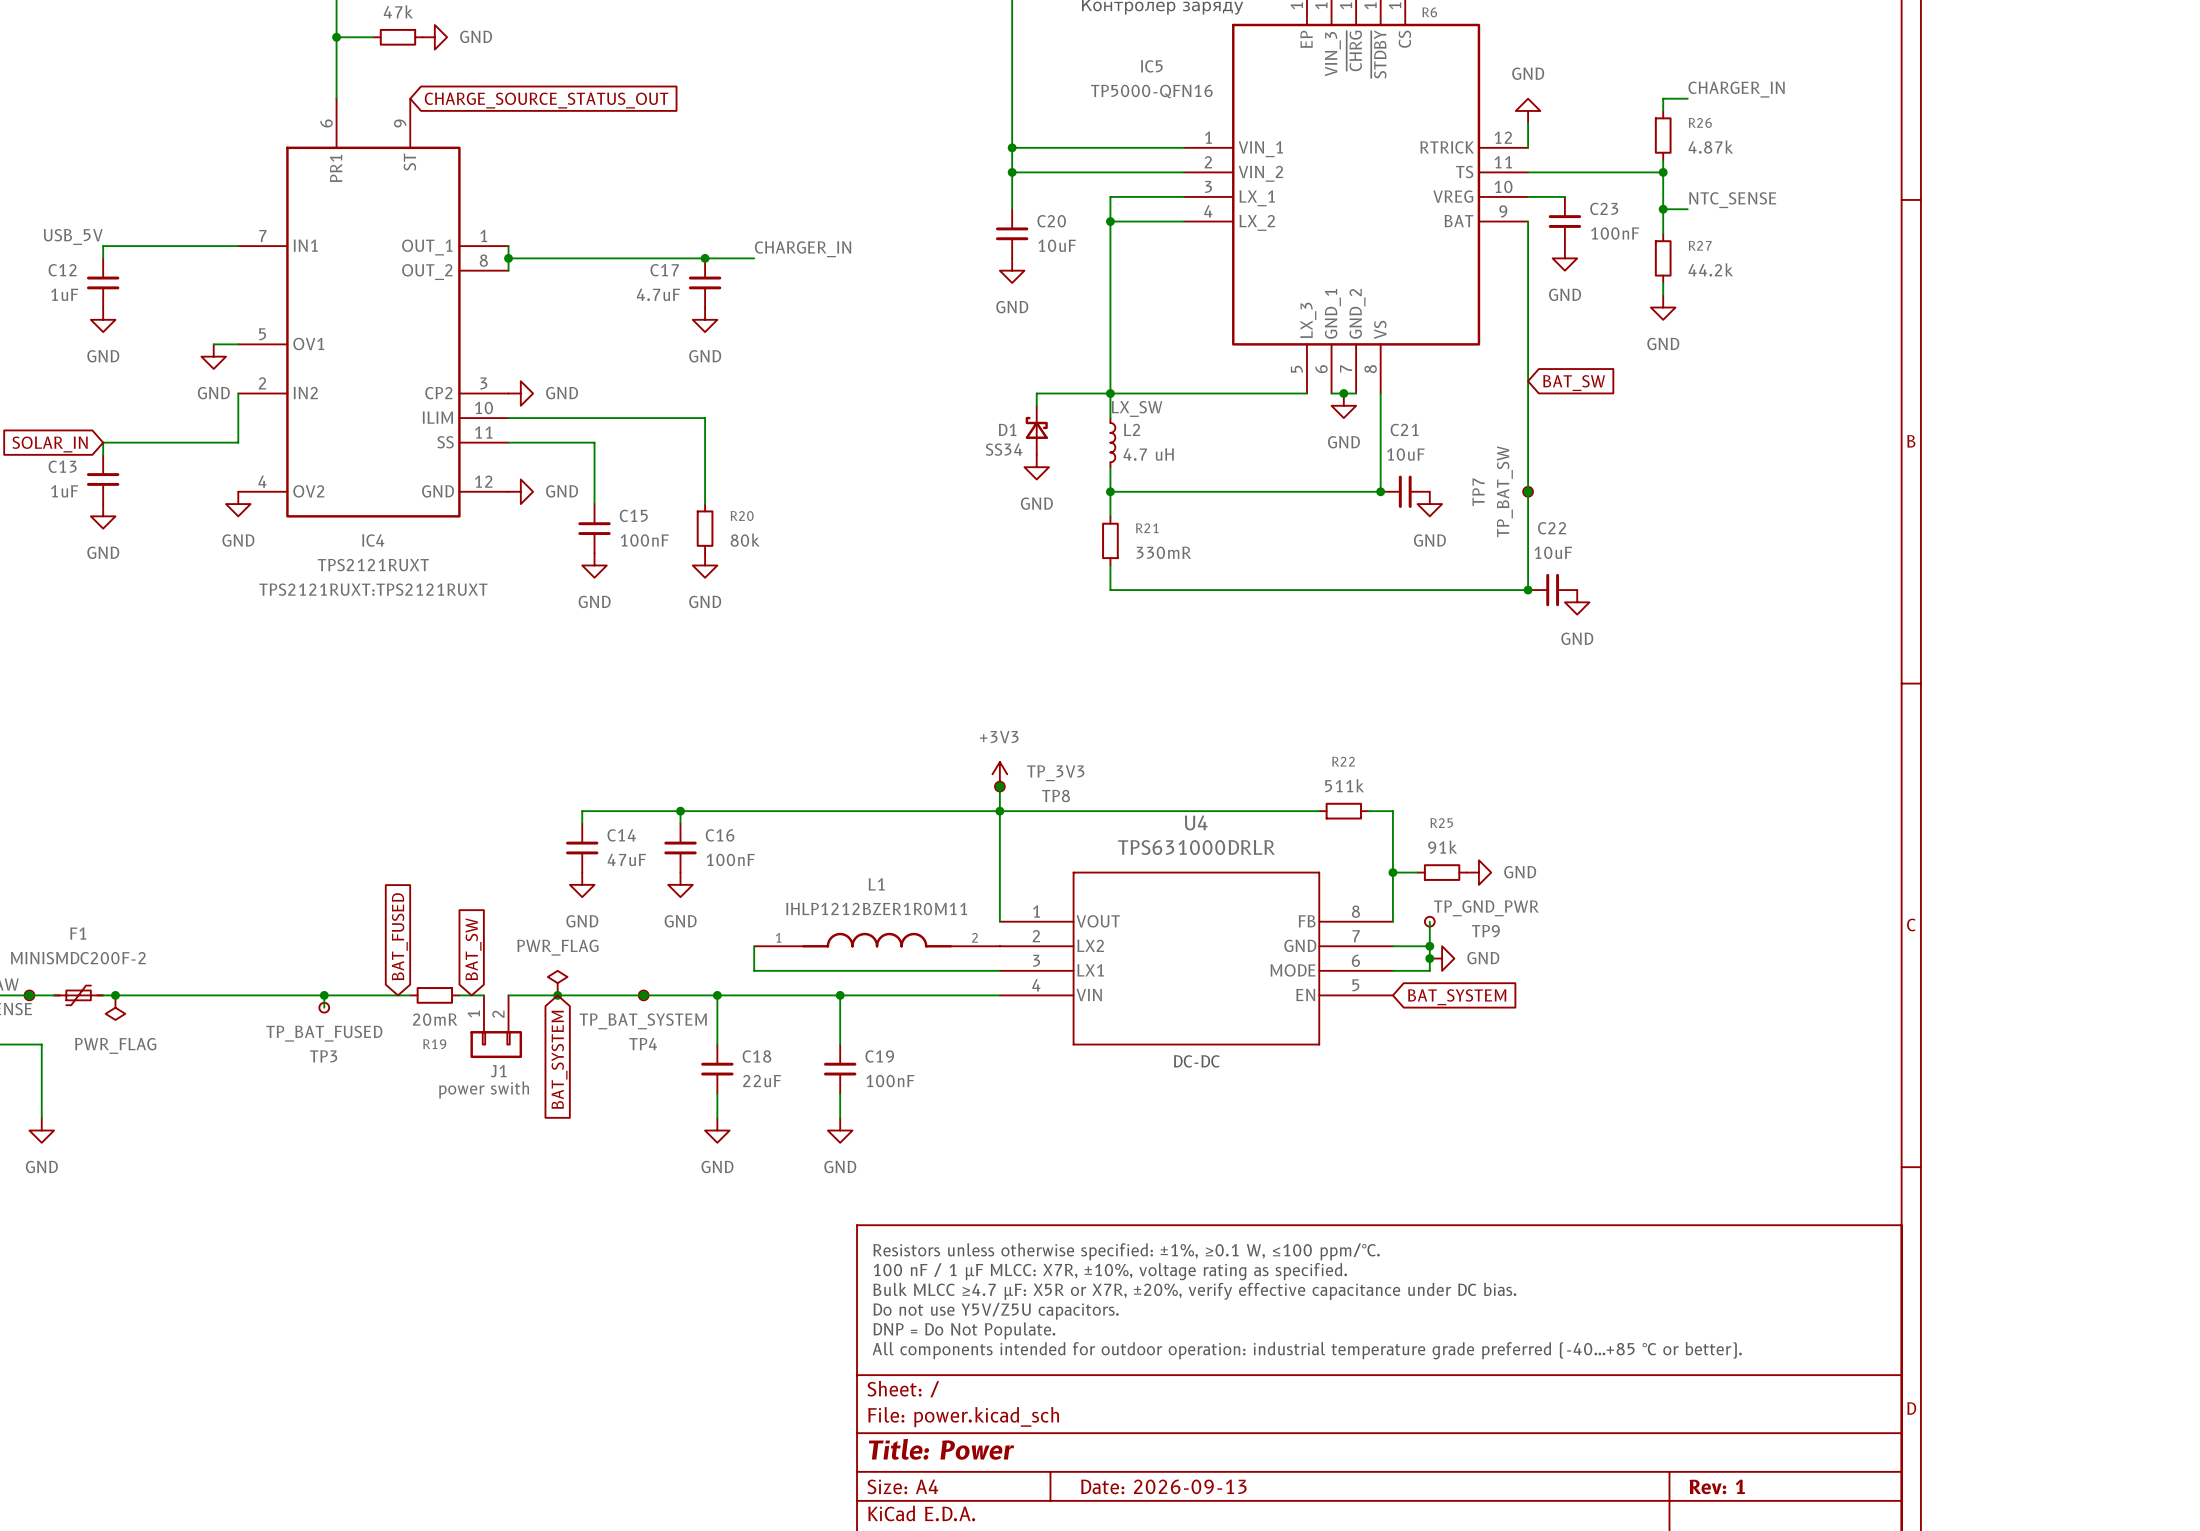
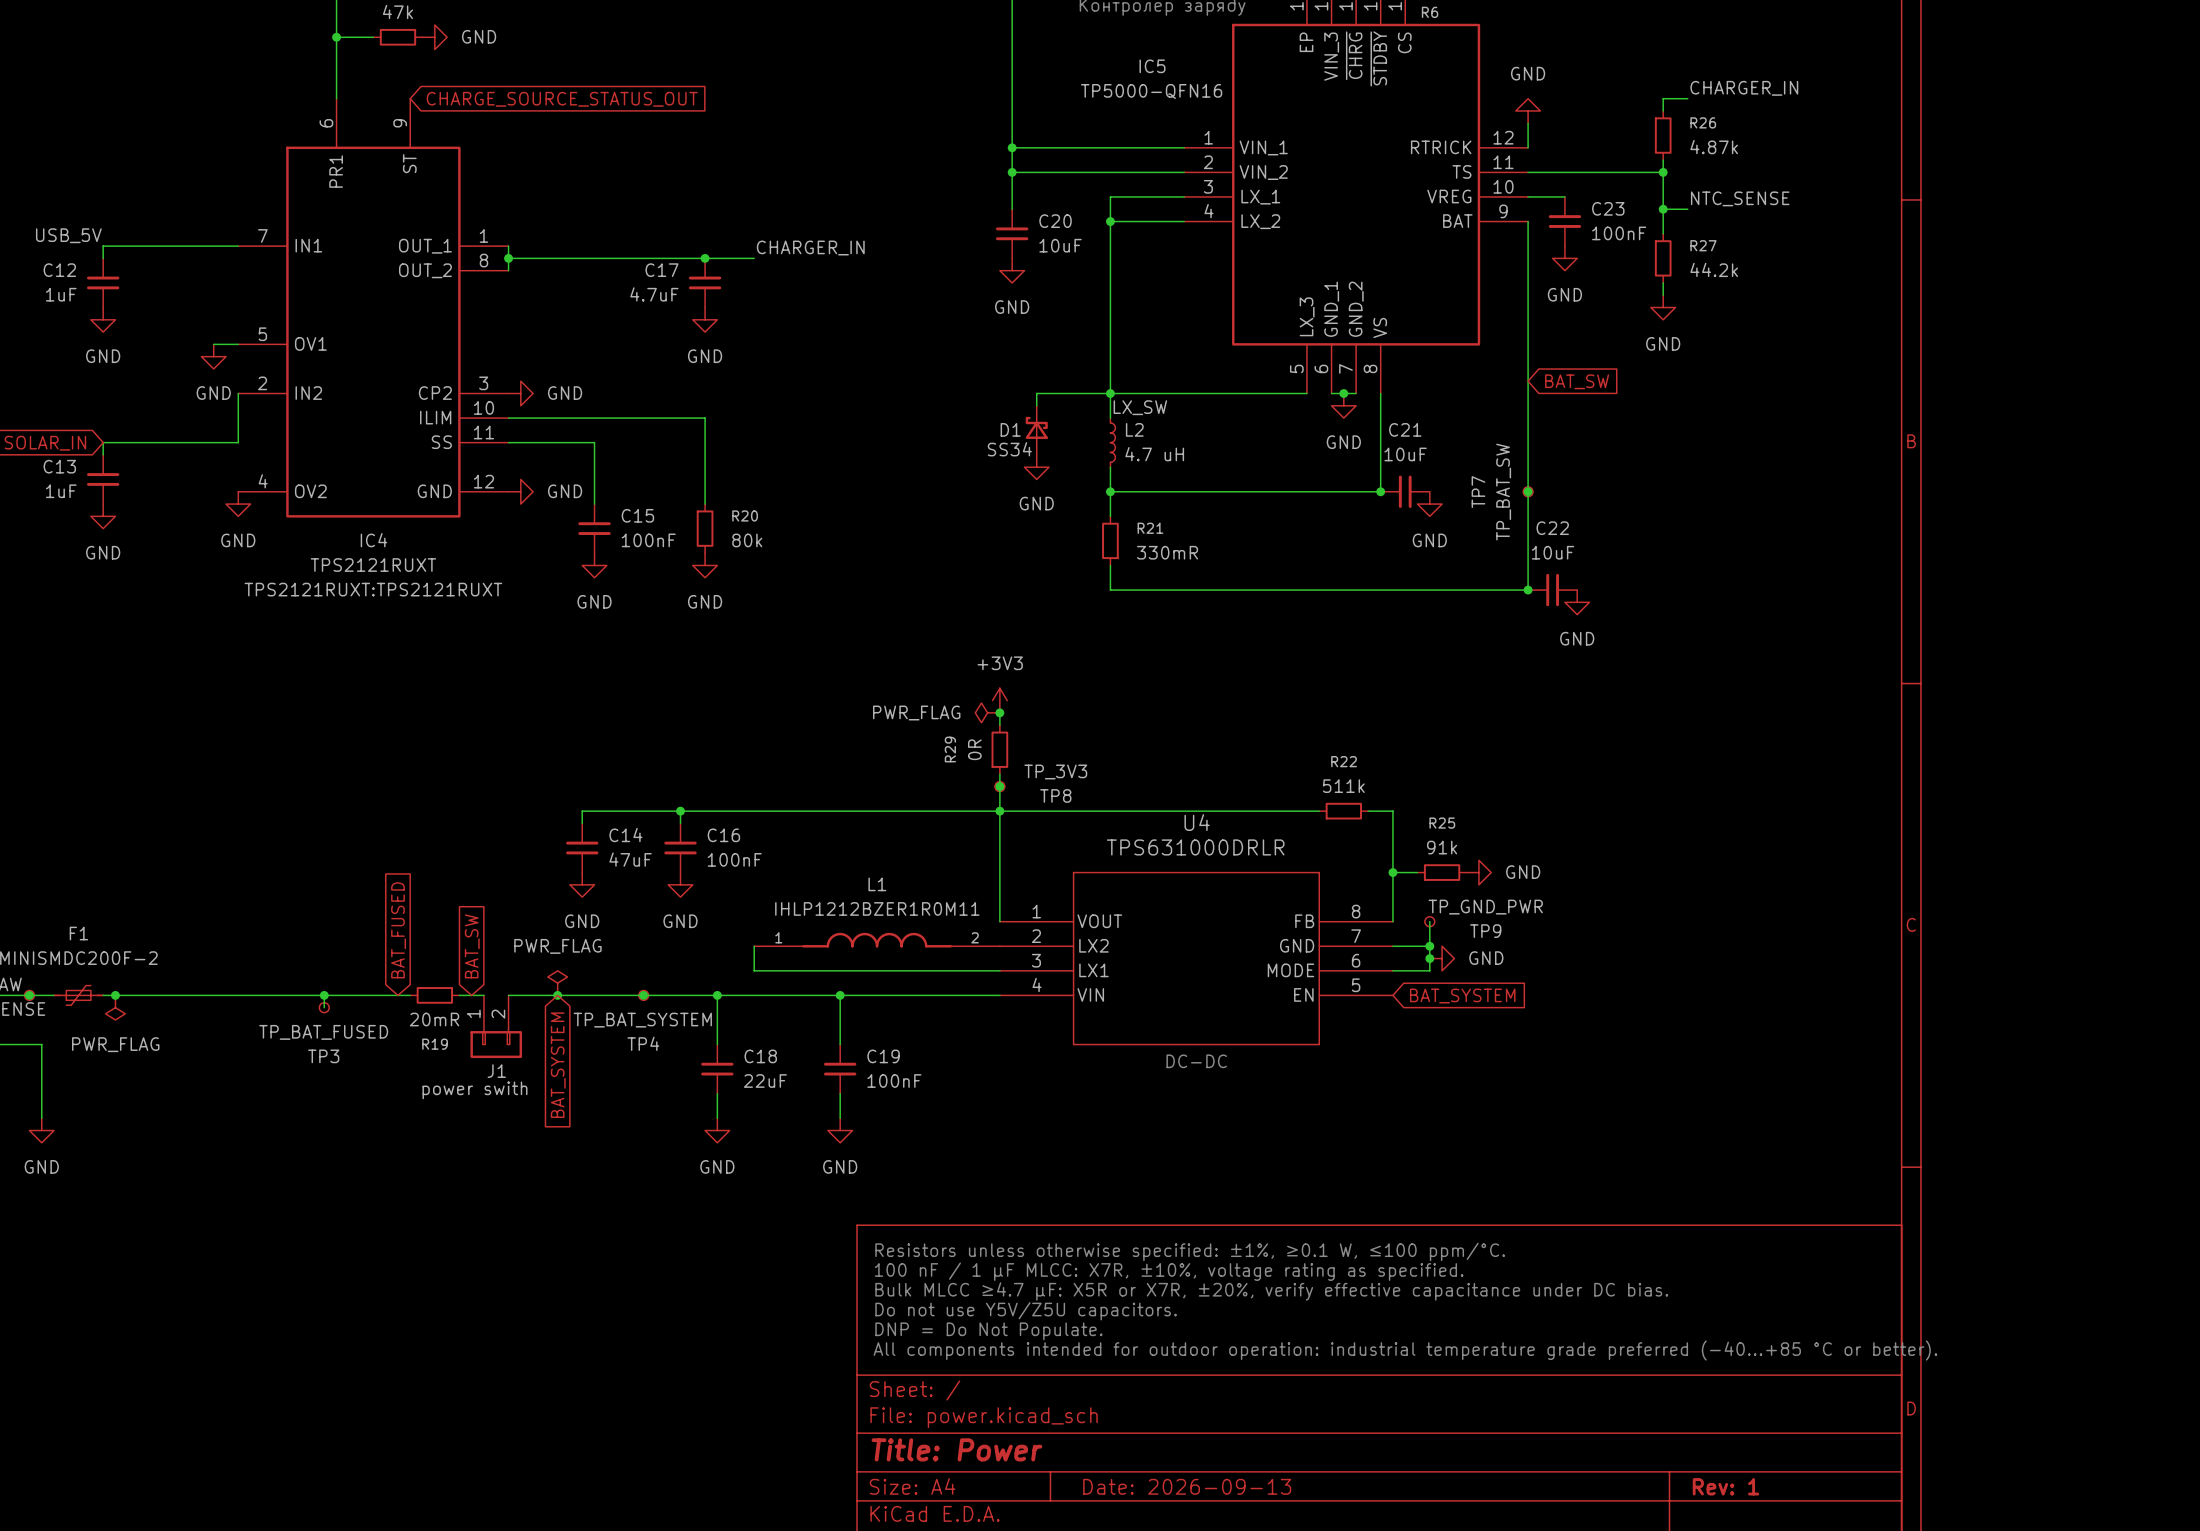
power symbol: none -> PWR_FLAG (987, 712)
wire: none -> (999, 712) (999, 725)
junction: none -> (999, 712)
R29: none -> 0R (999, 749)
power symbol position: +3V3 (999, 774) -> +3V3 (999, 700)

